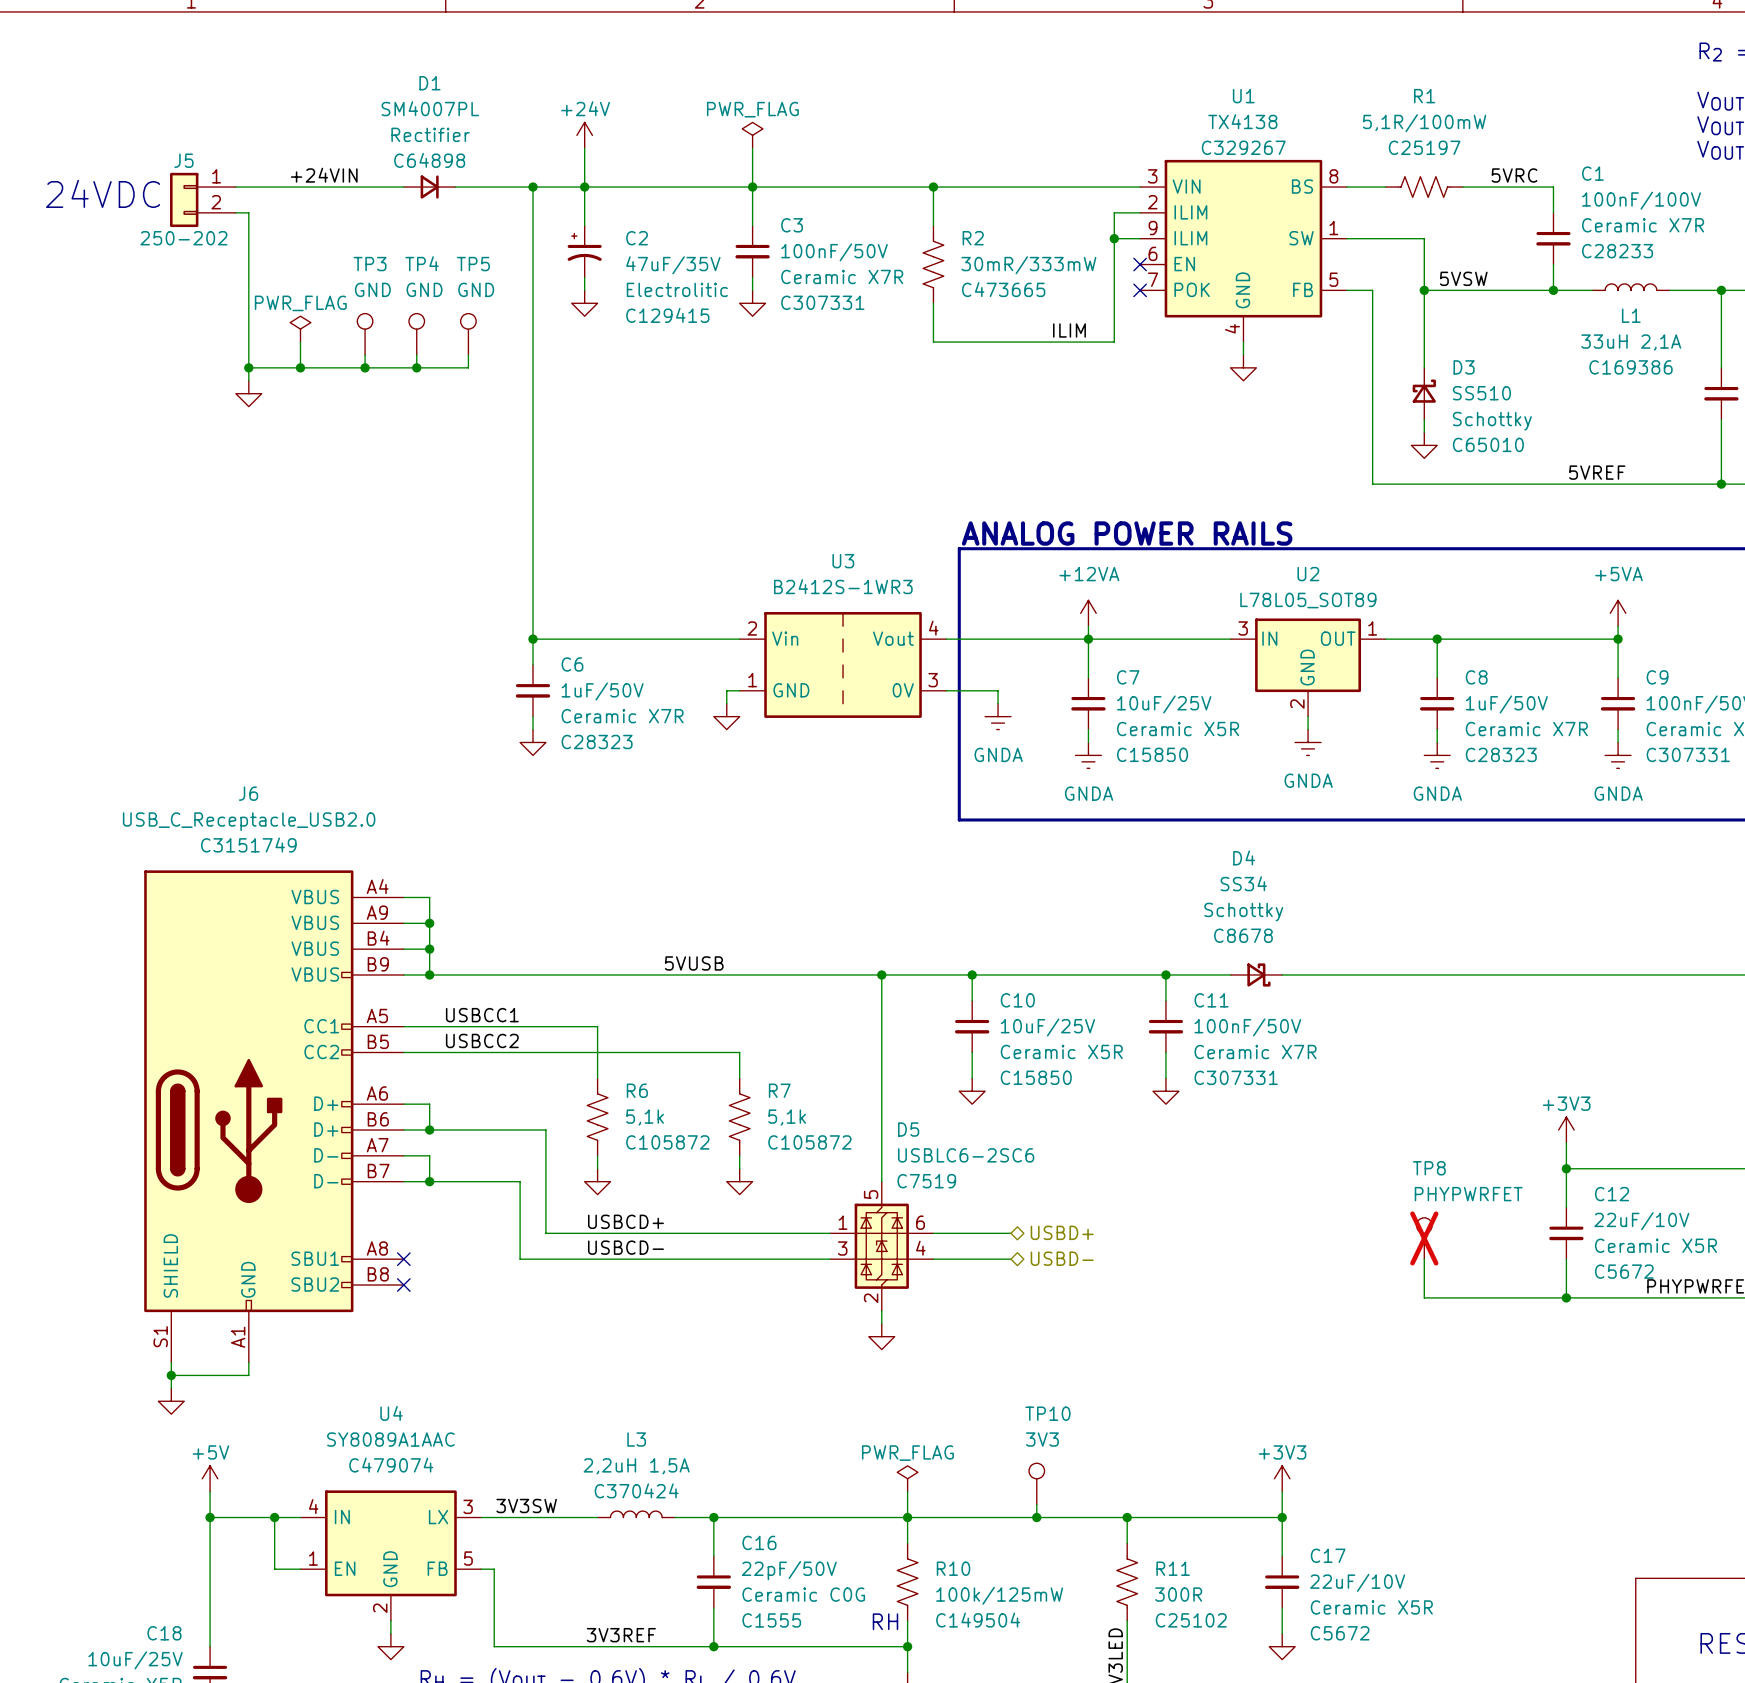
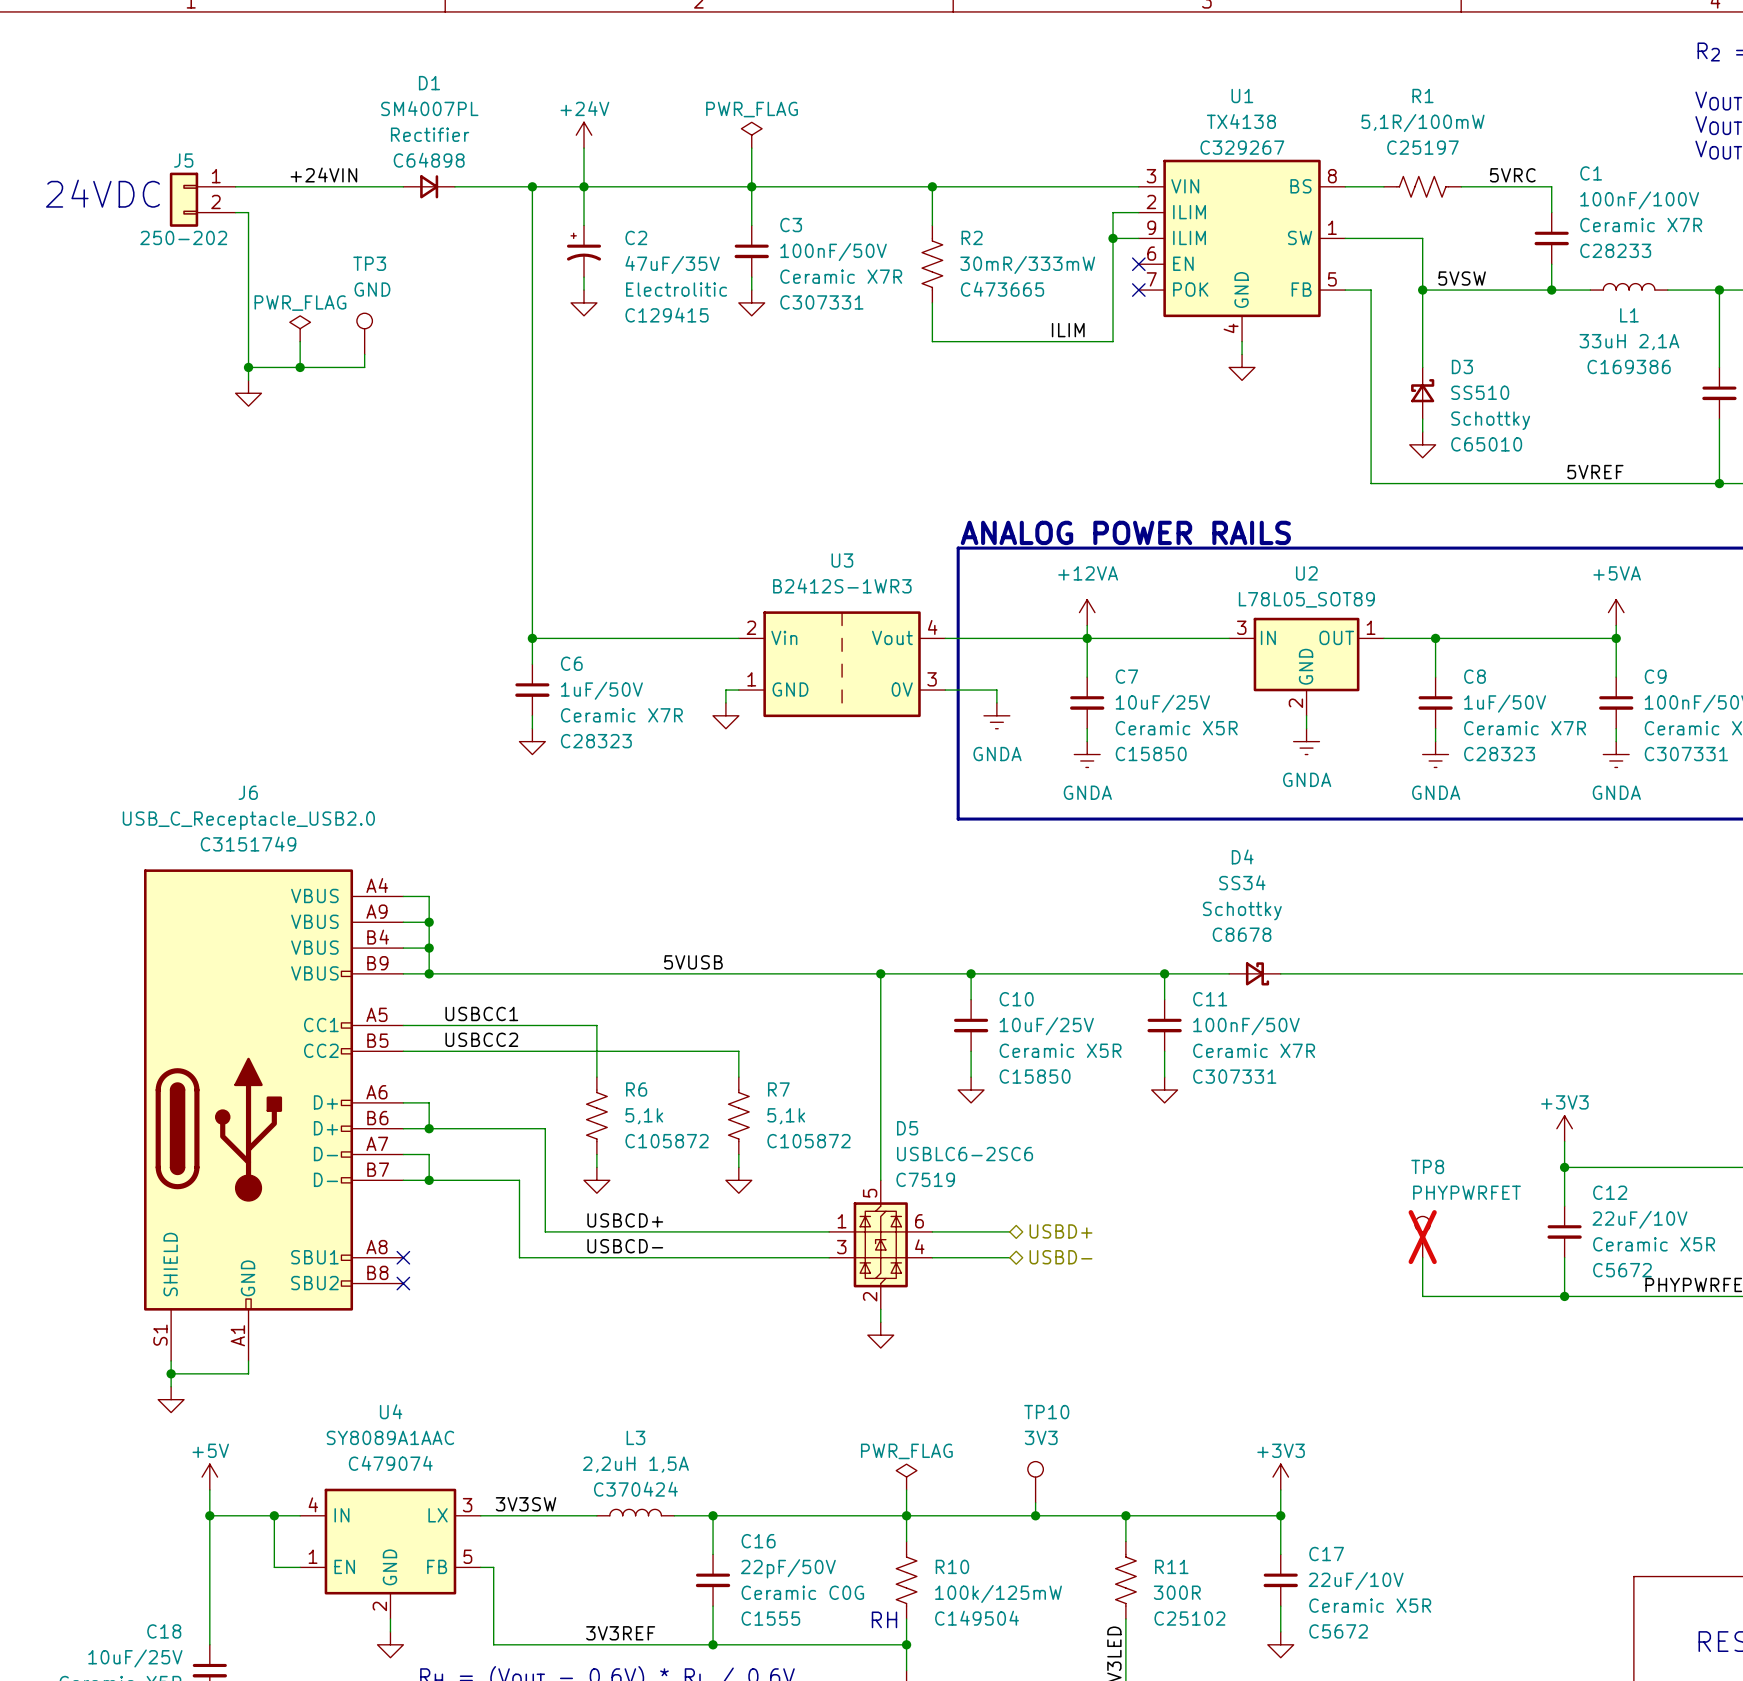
TP4: GND (416, 334) -> none
TP5: GND (468, 334) -> none
wire: (416, 354) (416, 367) -> none
wire: (468, 354) (468, 367) (365, 367) -> none
junction: (365, 367) -> none
junction: (416, 367) -> none

